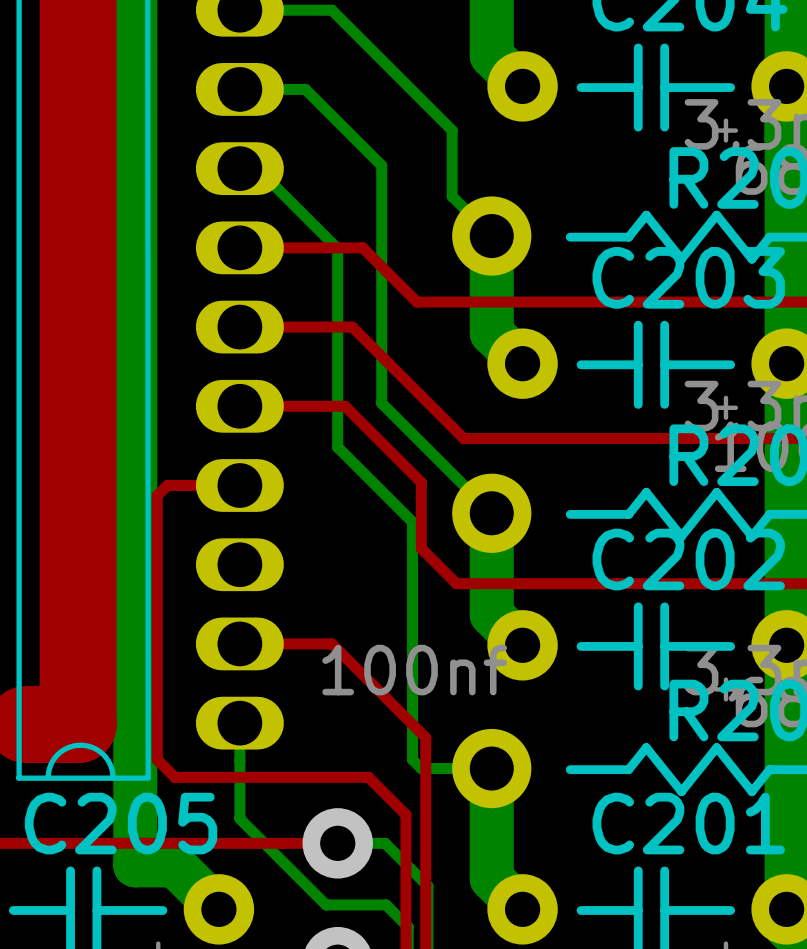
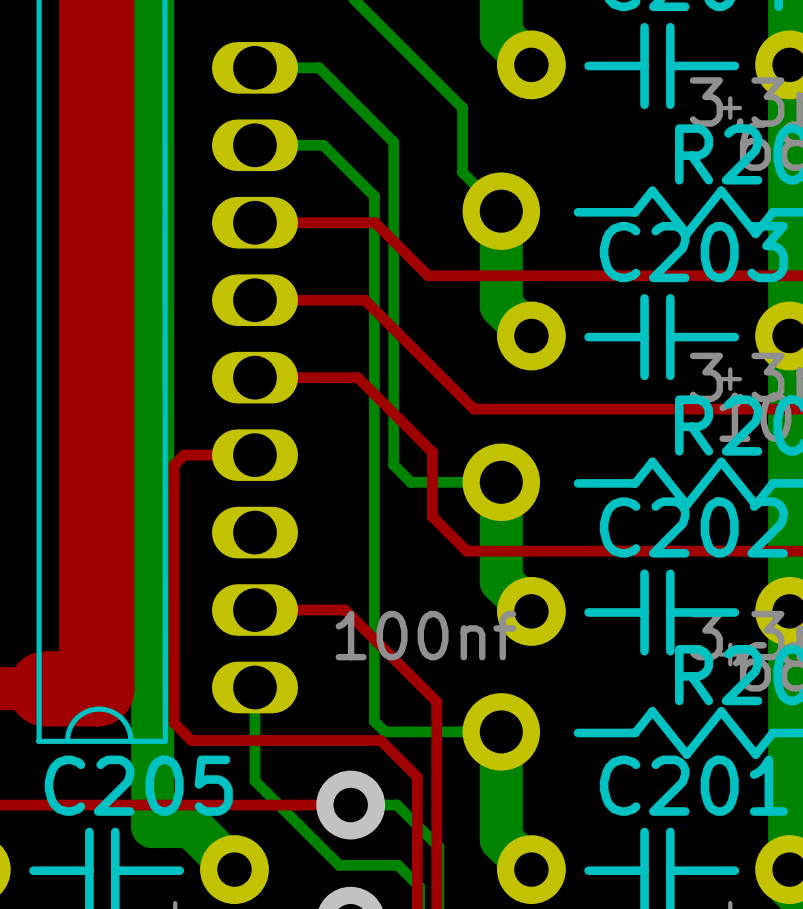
bottom track: (257, 168) (337, 248) (337, 447) (412, 522) (412, 759) (421, 768) -> (272, 145) (323, 145) (374, 196) (374, 721) (385, 731) (432, 731)
bottom track: (381, 403) (491, 513) -> (393, 374) (393, 465) (410, 482) (501, 482)

